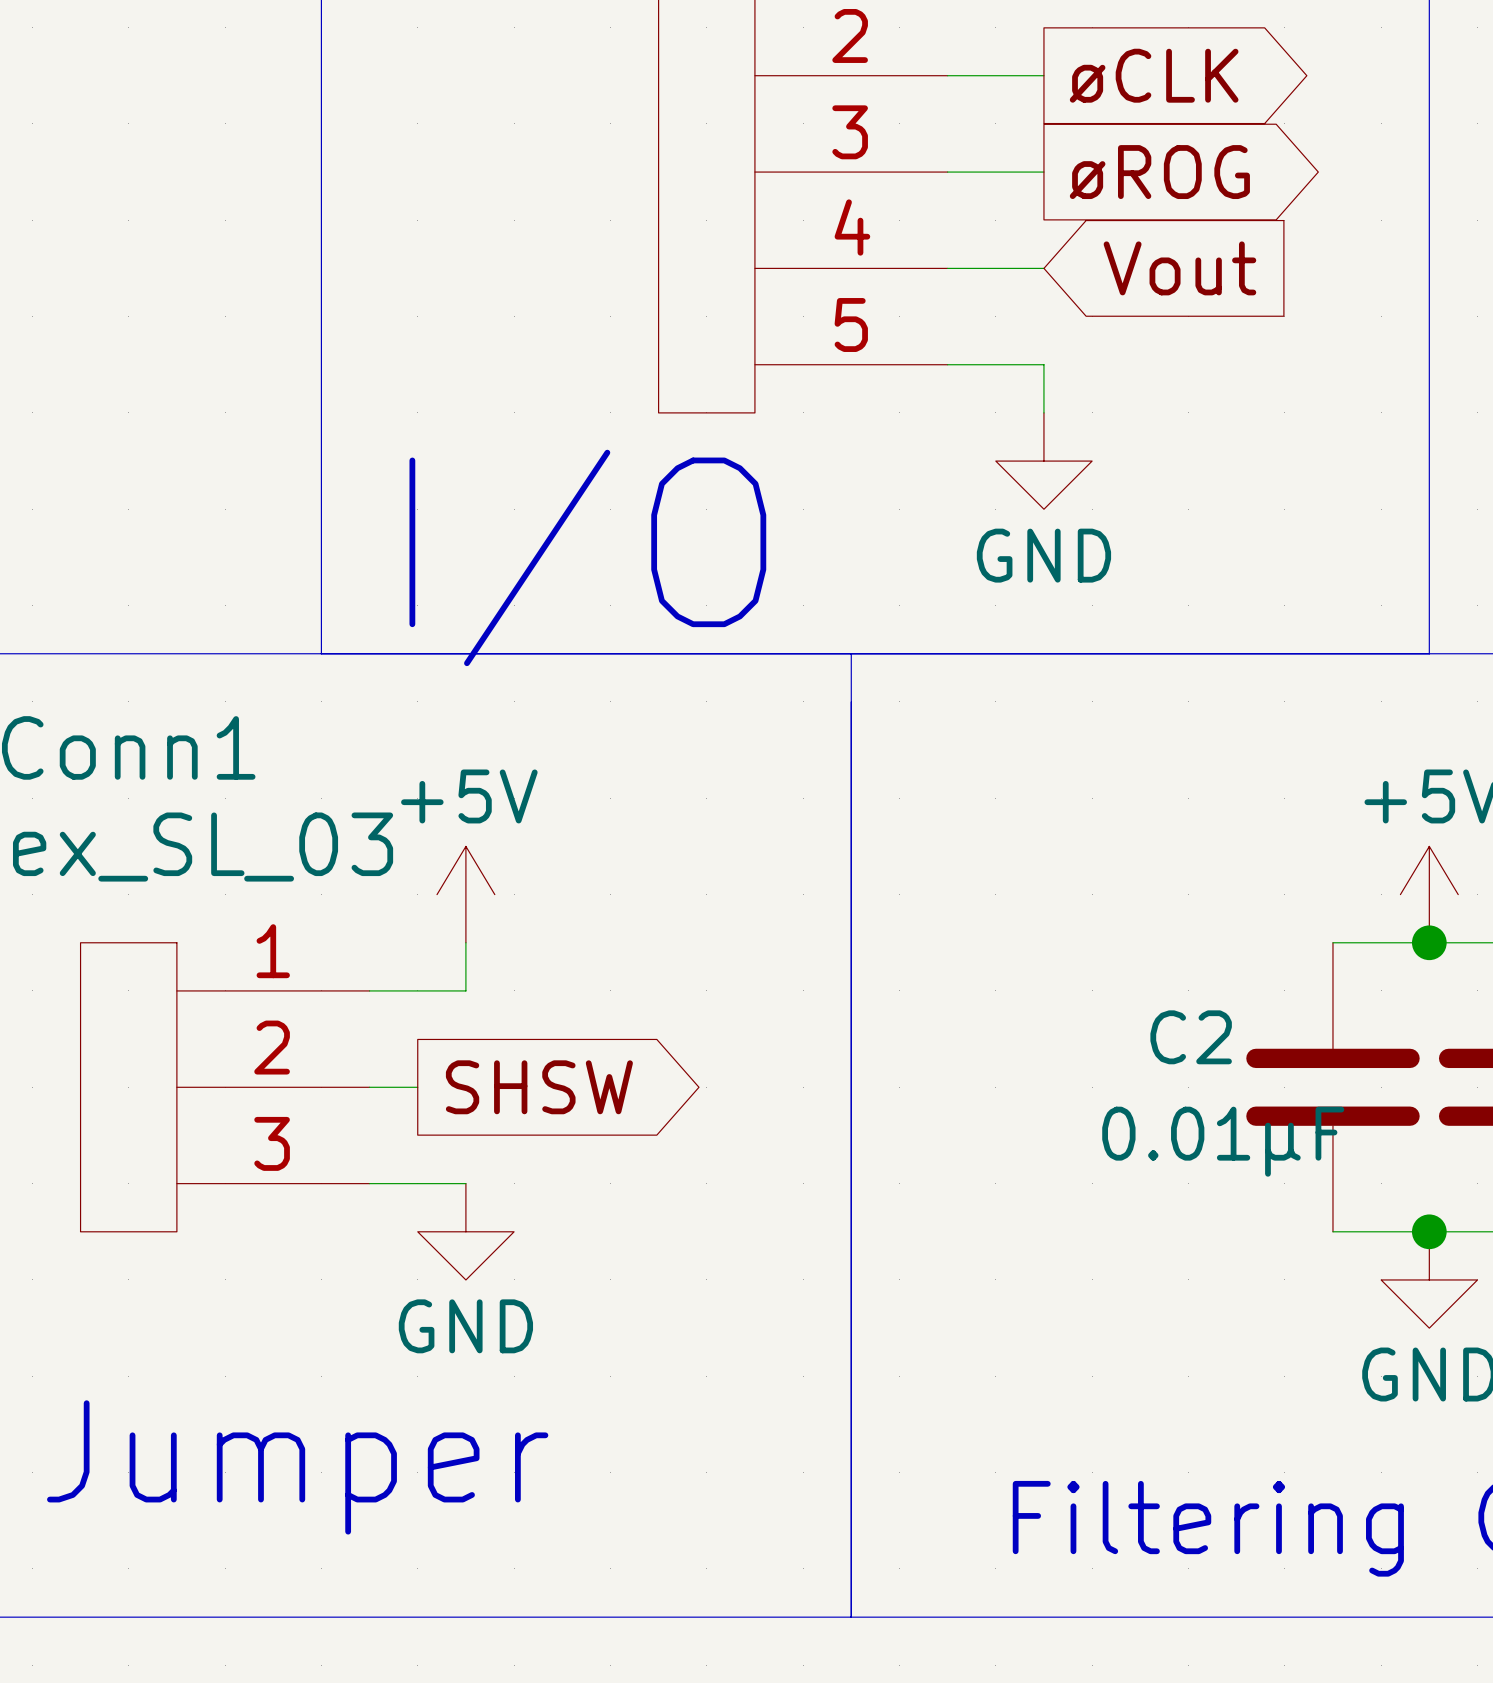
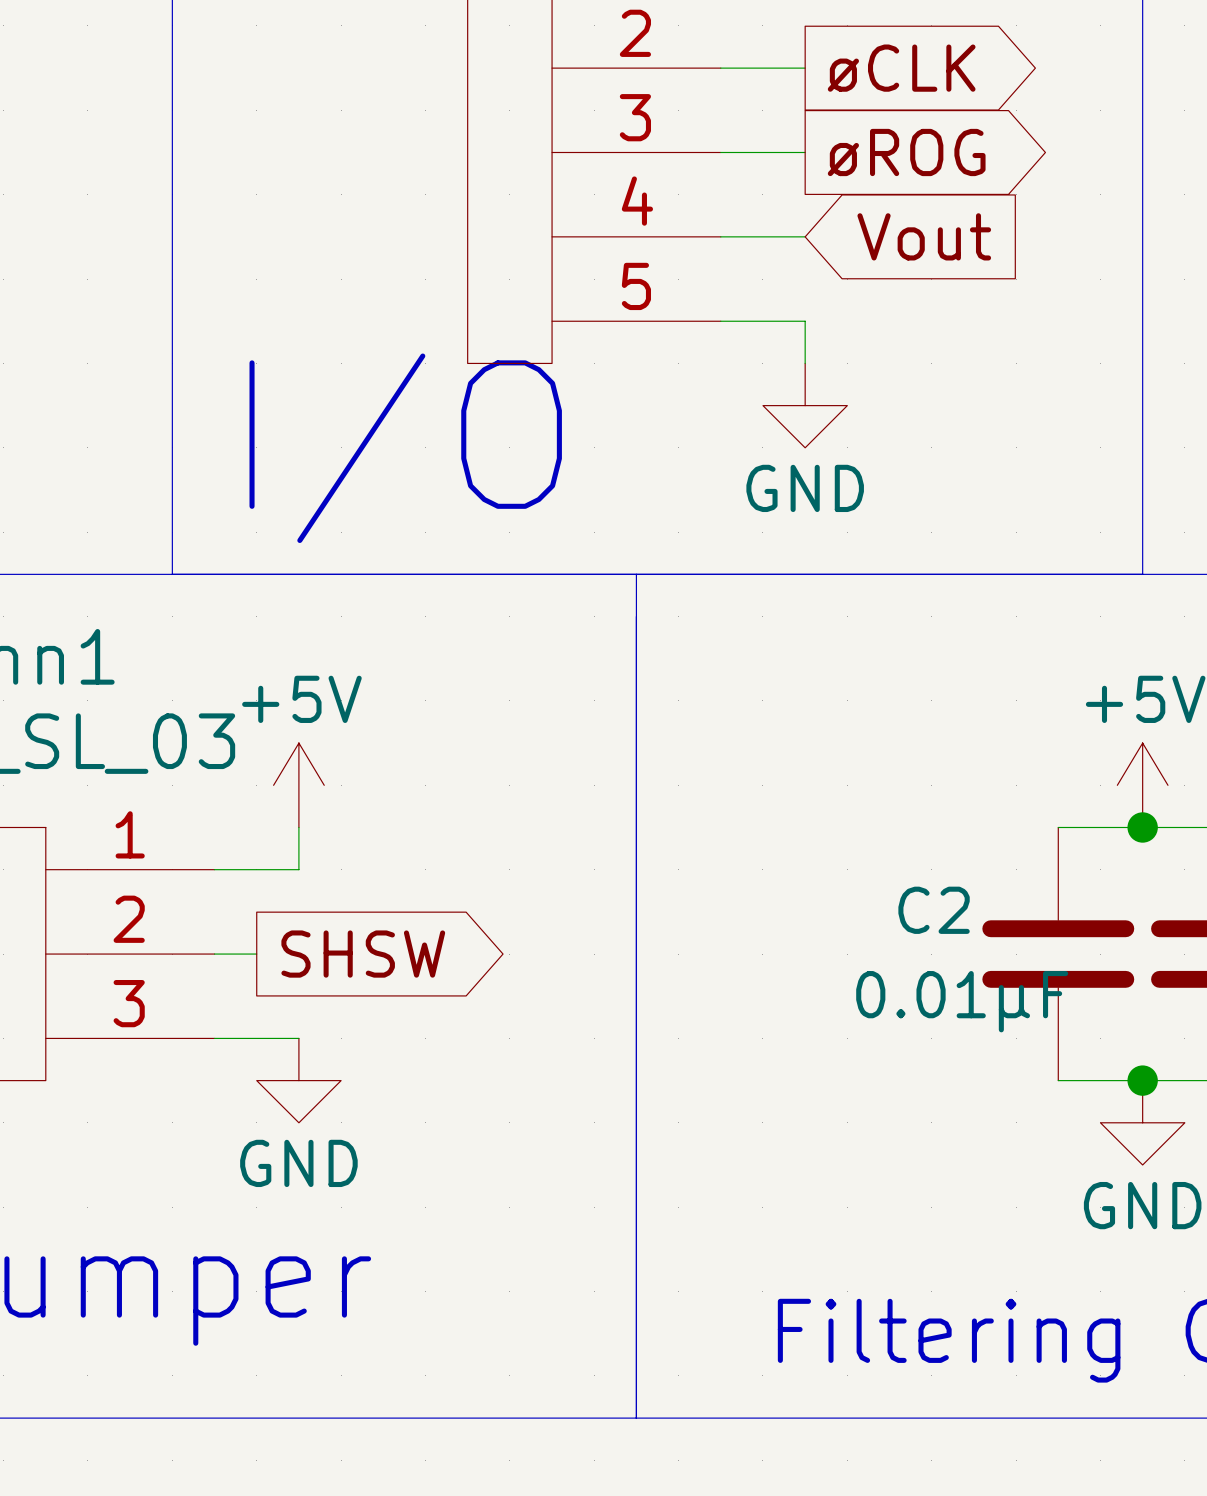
text position: I/O (587, 557) -> I/O (405, 448)

